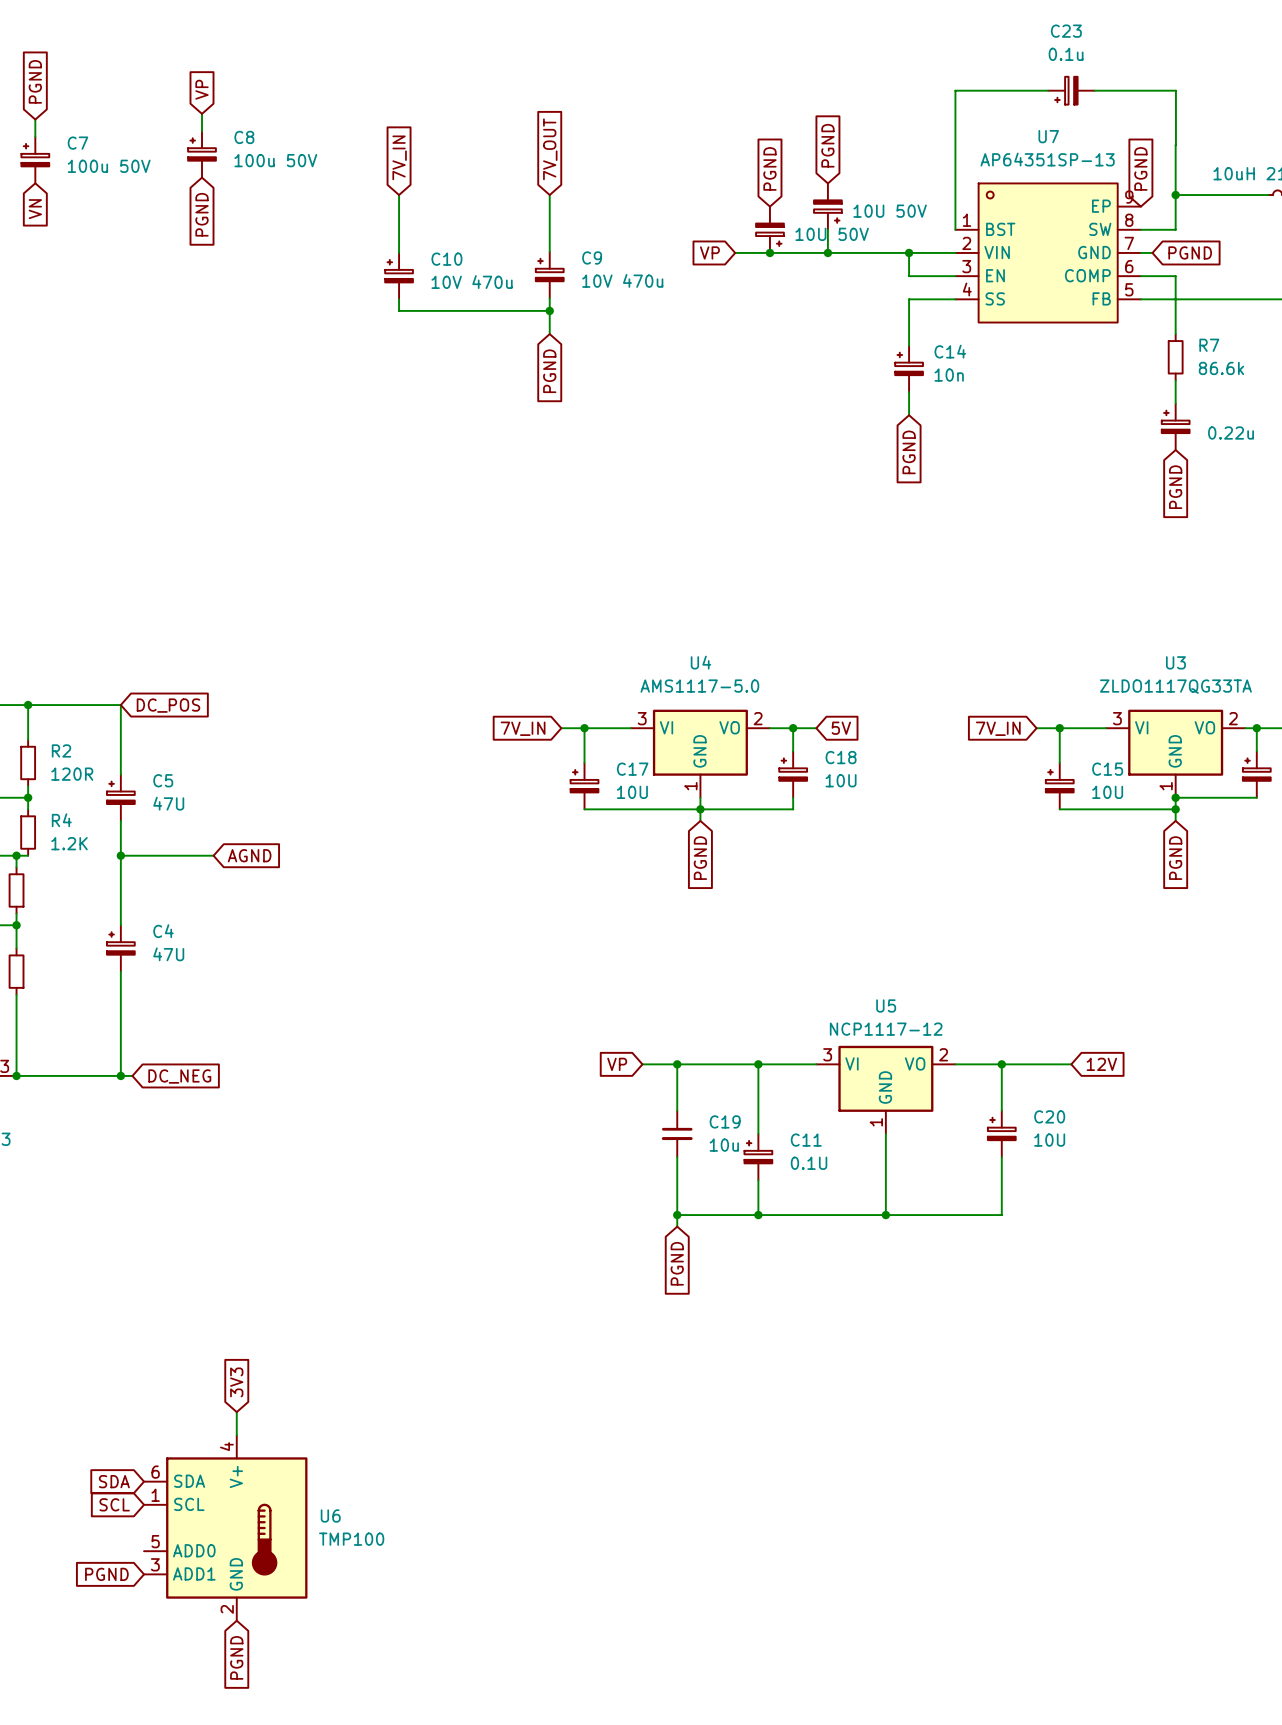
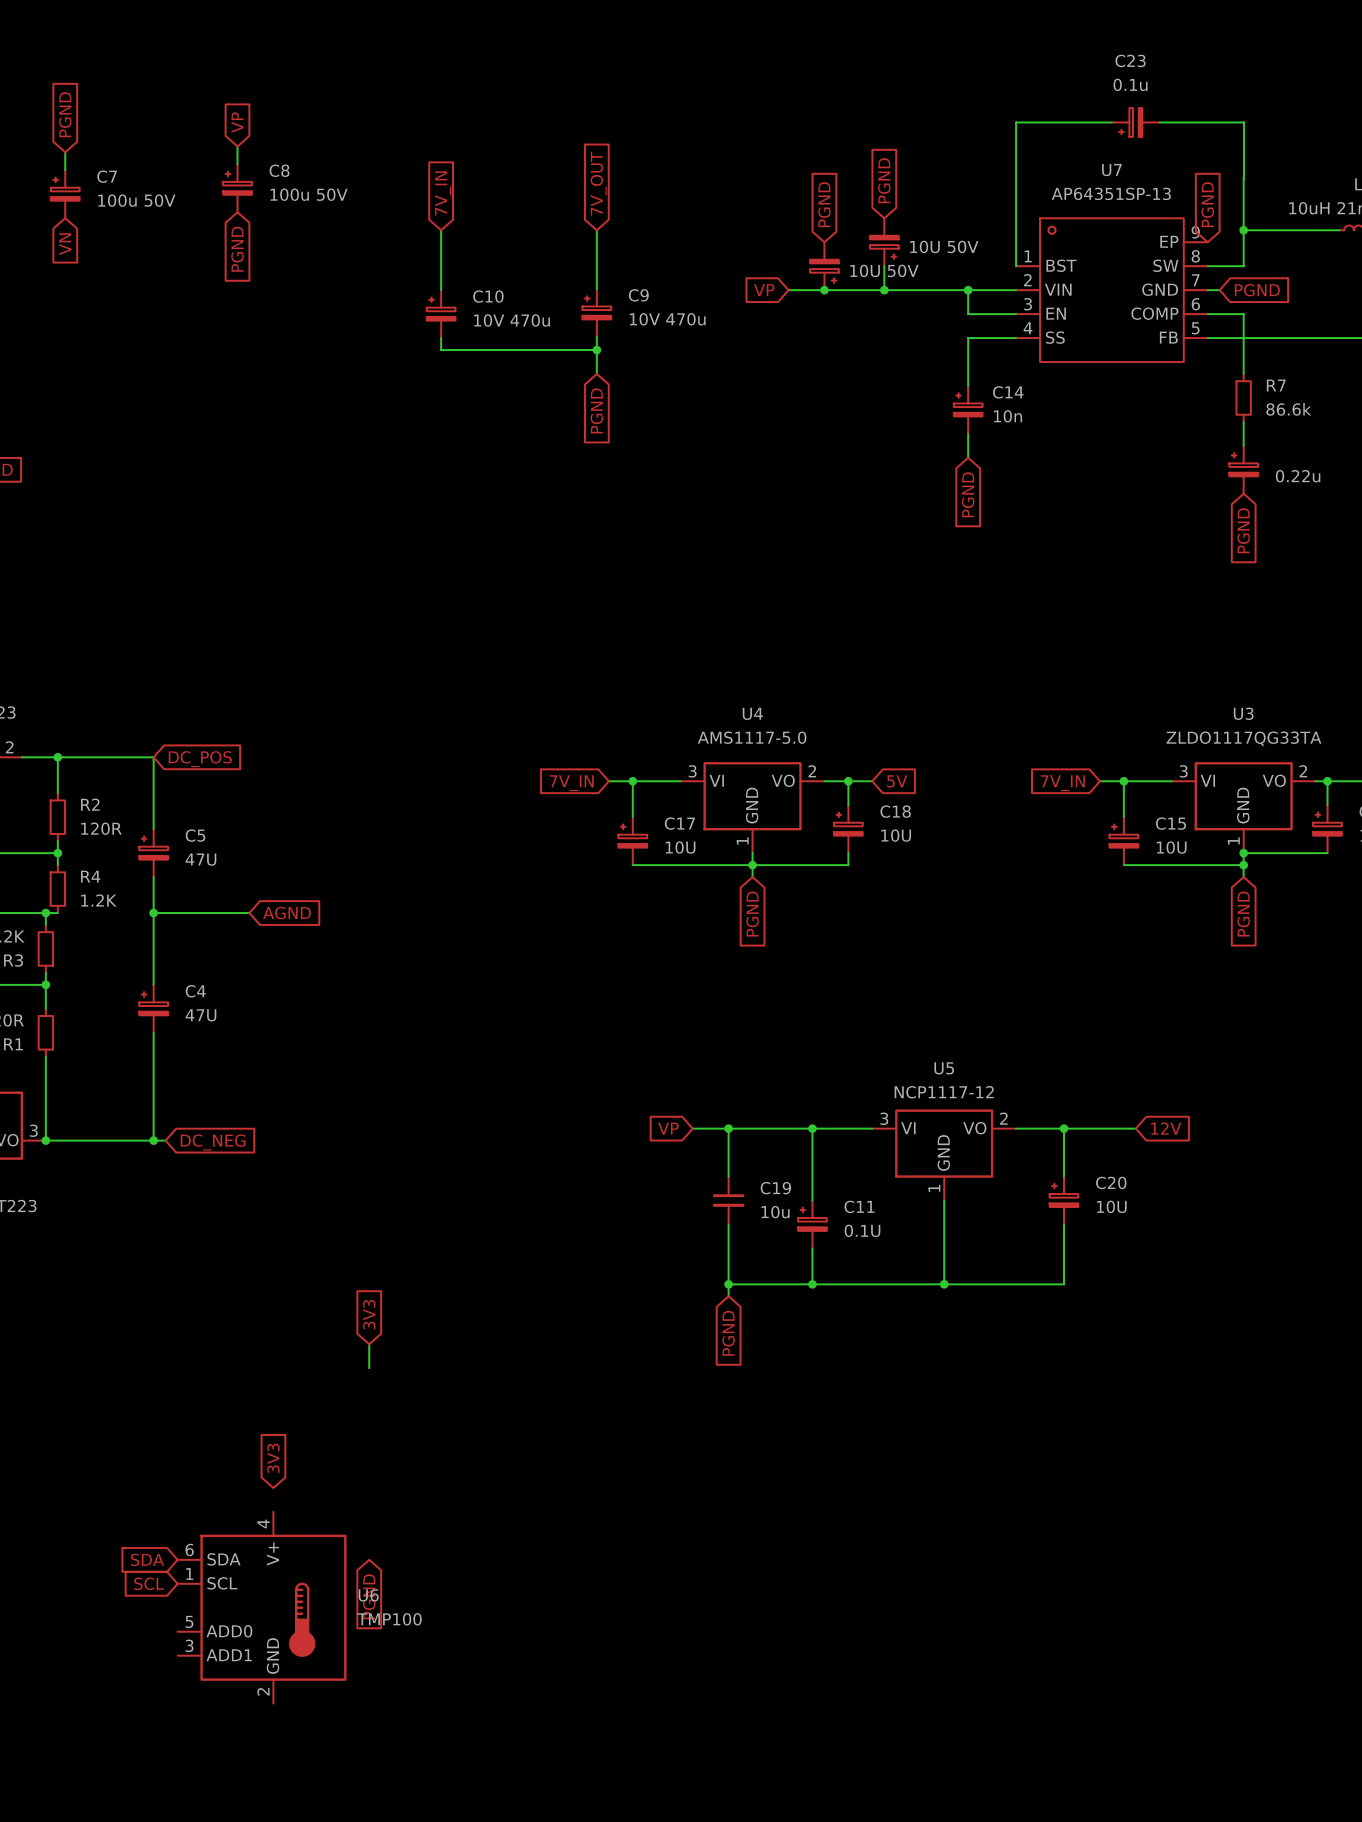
global label: none -> 3V3 (369, 1314)
wire: (236, 1412) (236, 1435) -> (369, 1344) (369, 1368)
global label: none -> PGND (369, 1596)
global label: PGND (106, 1574) -> none
global label: PGND (236, 1657) -> none

